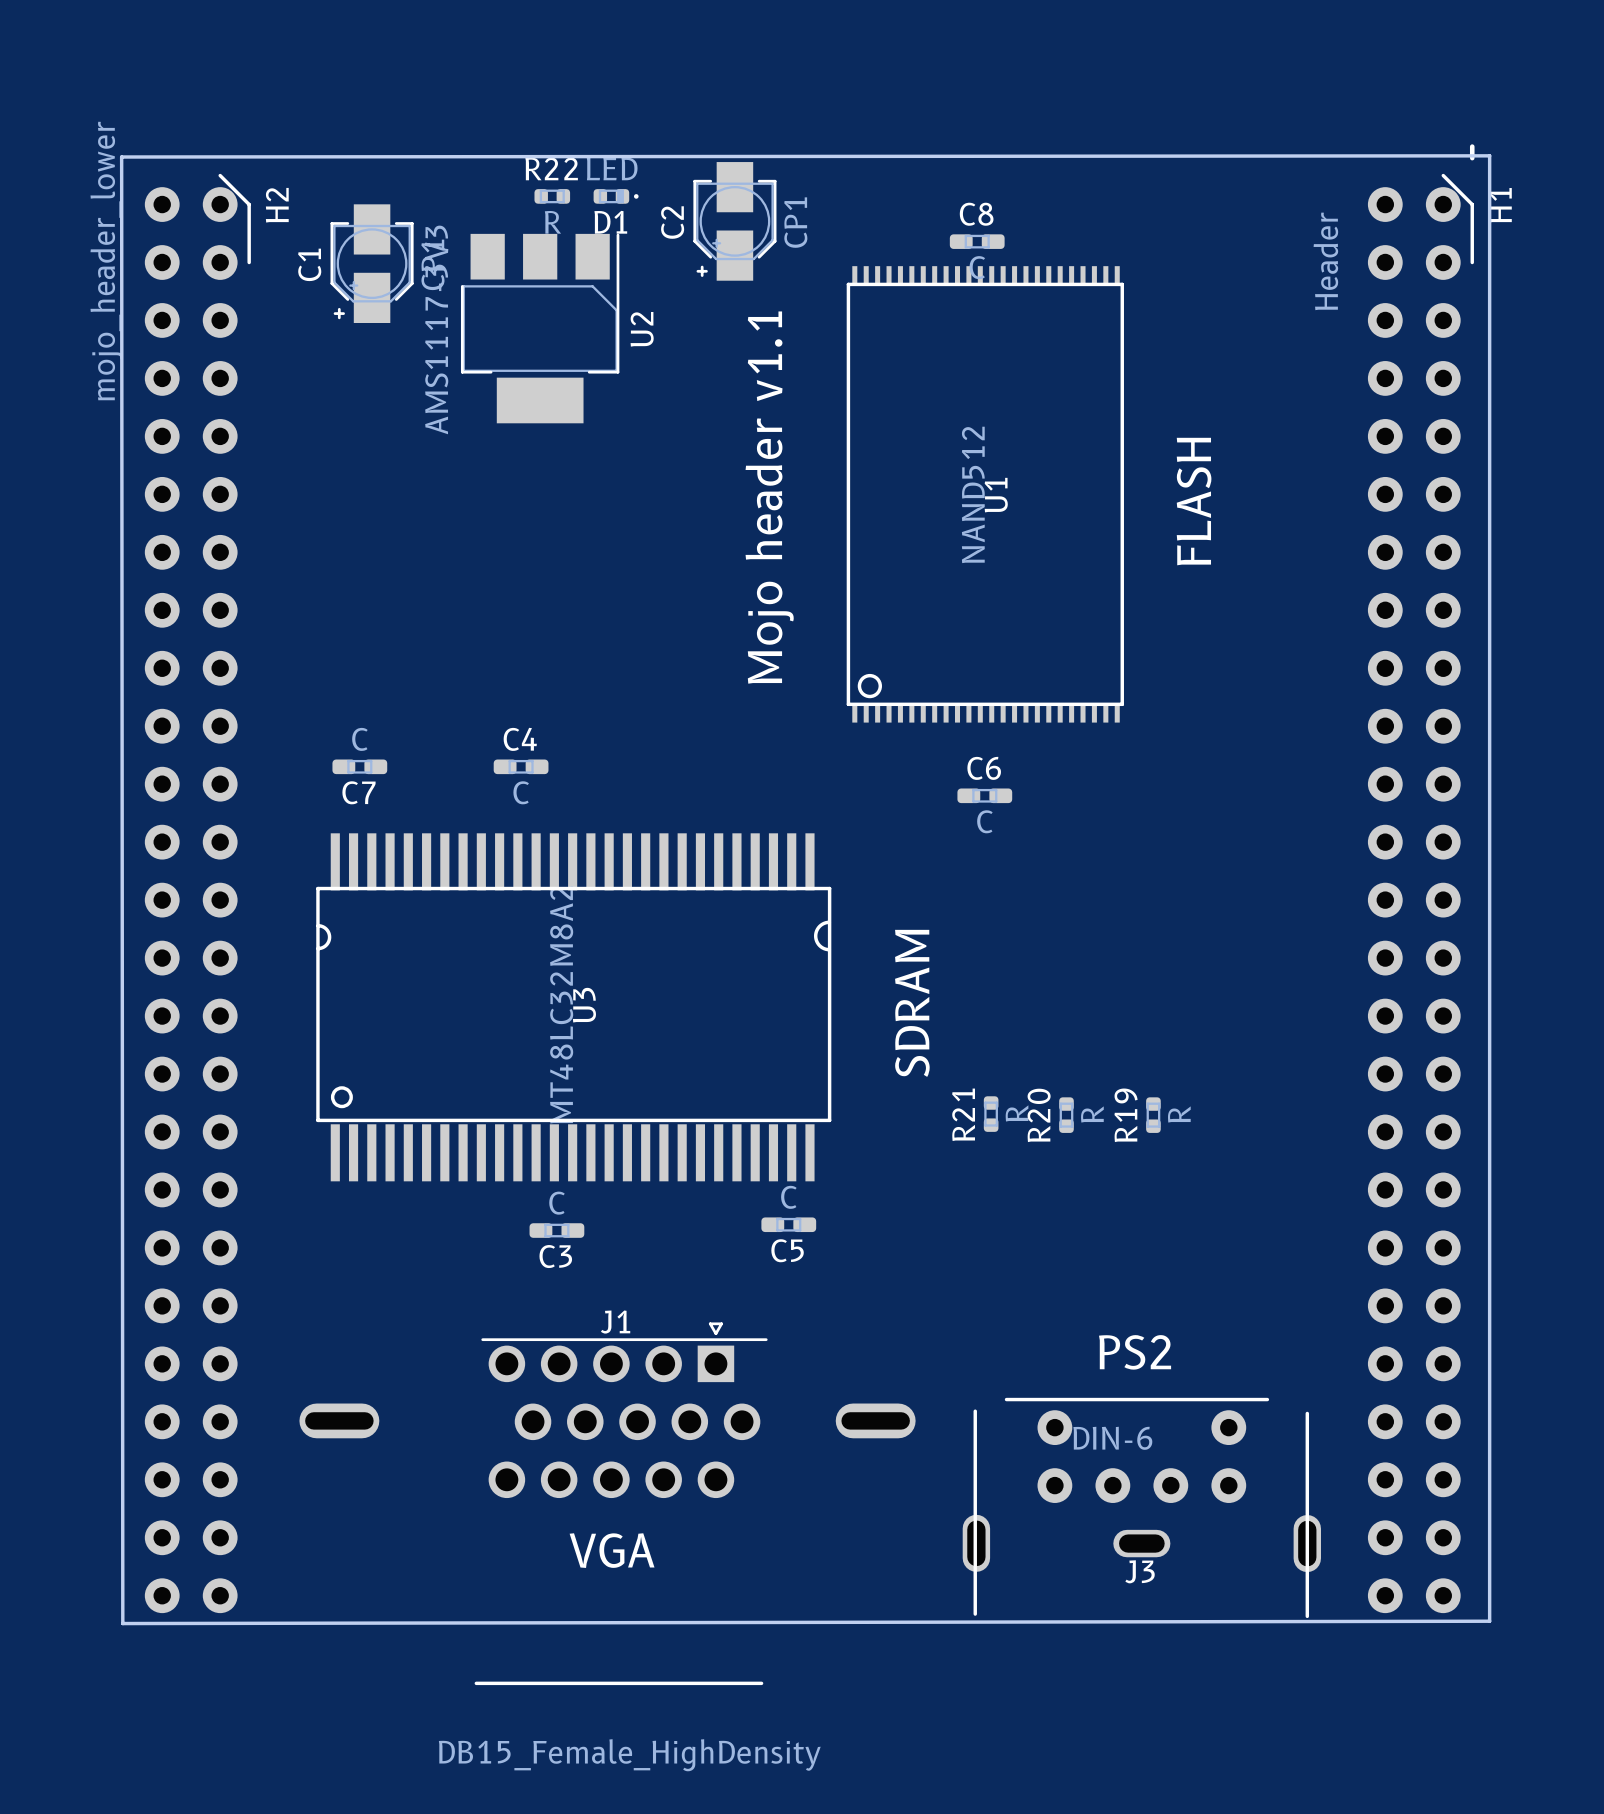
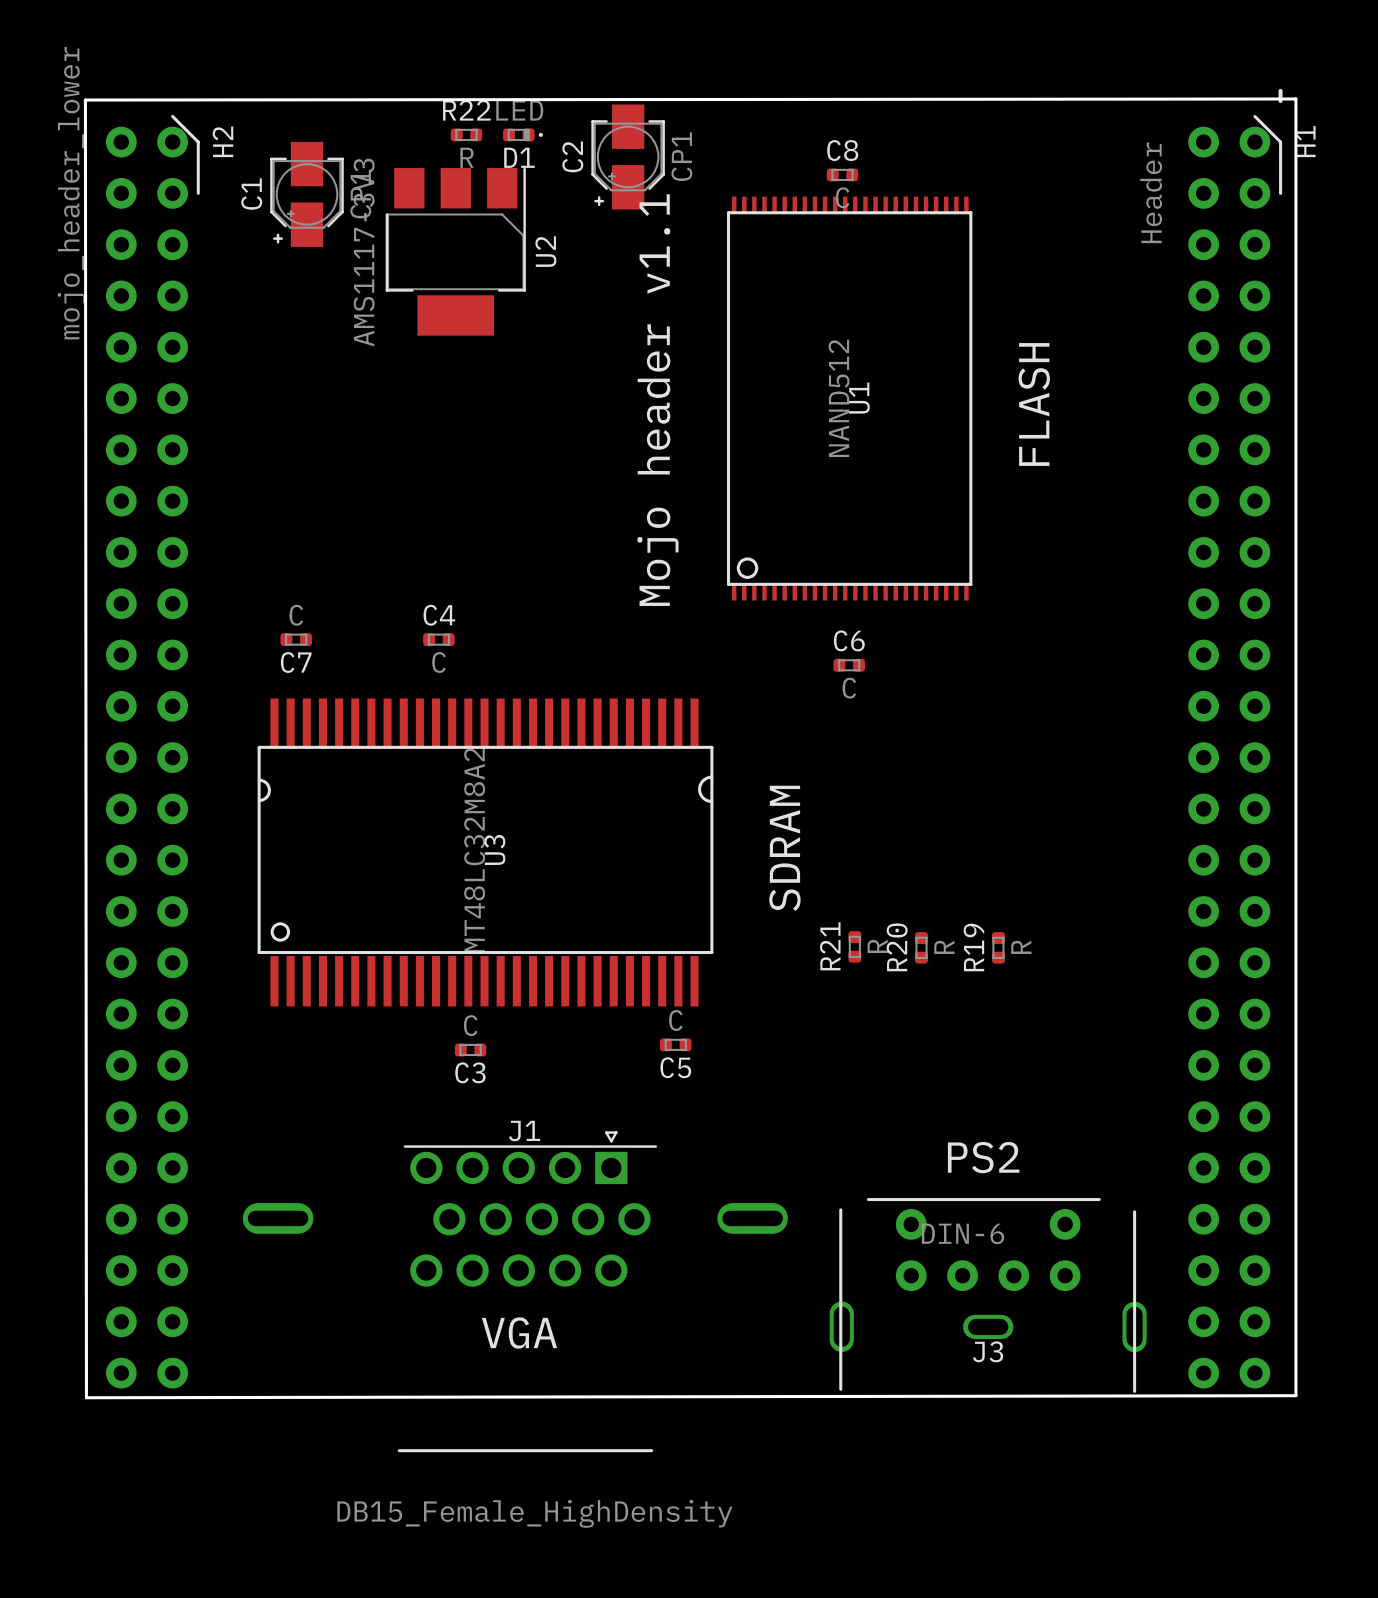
C8 footprint: [949, 234, 1005, 249] -> [826, 168, 859, 182]
C7 footprint: [332, 759, 388, 775] -> [280, 633, 312, 647]
C4 footprint: [493, 759, 549, 775] -> [423, 633, 455, 647]
C6 footprint: [957, 788, 1013, 804] -> [833, 658, 865, 672]
C5 footprint: [761, 1217, 817, 1233] -> [660, 1038, 692, 1052]
C3 footprint: [529, 1223, 585, 1238] -> [454, 1043, 487, 1057]

